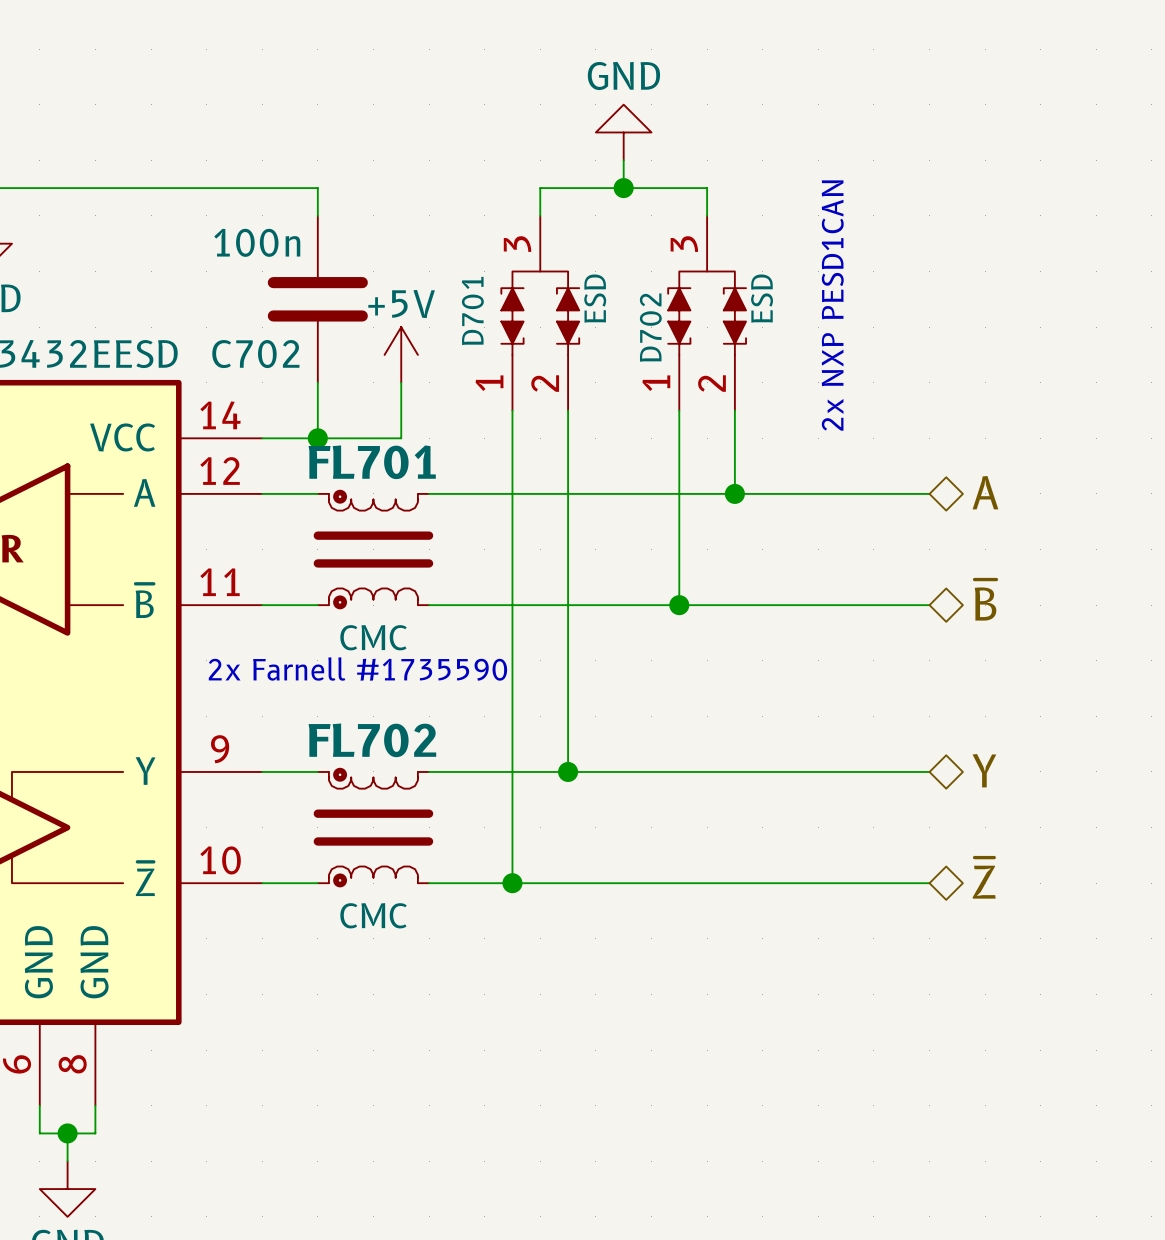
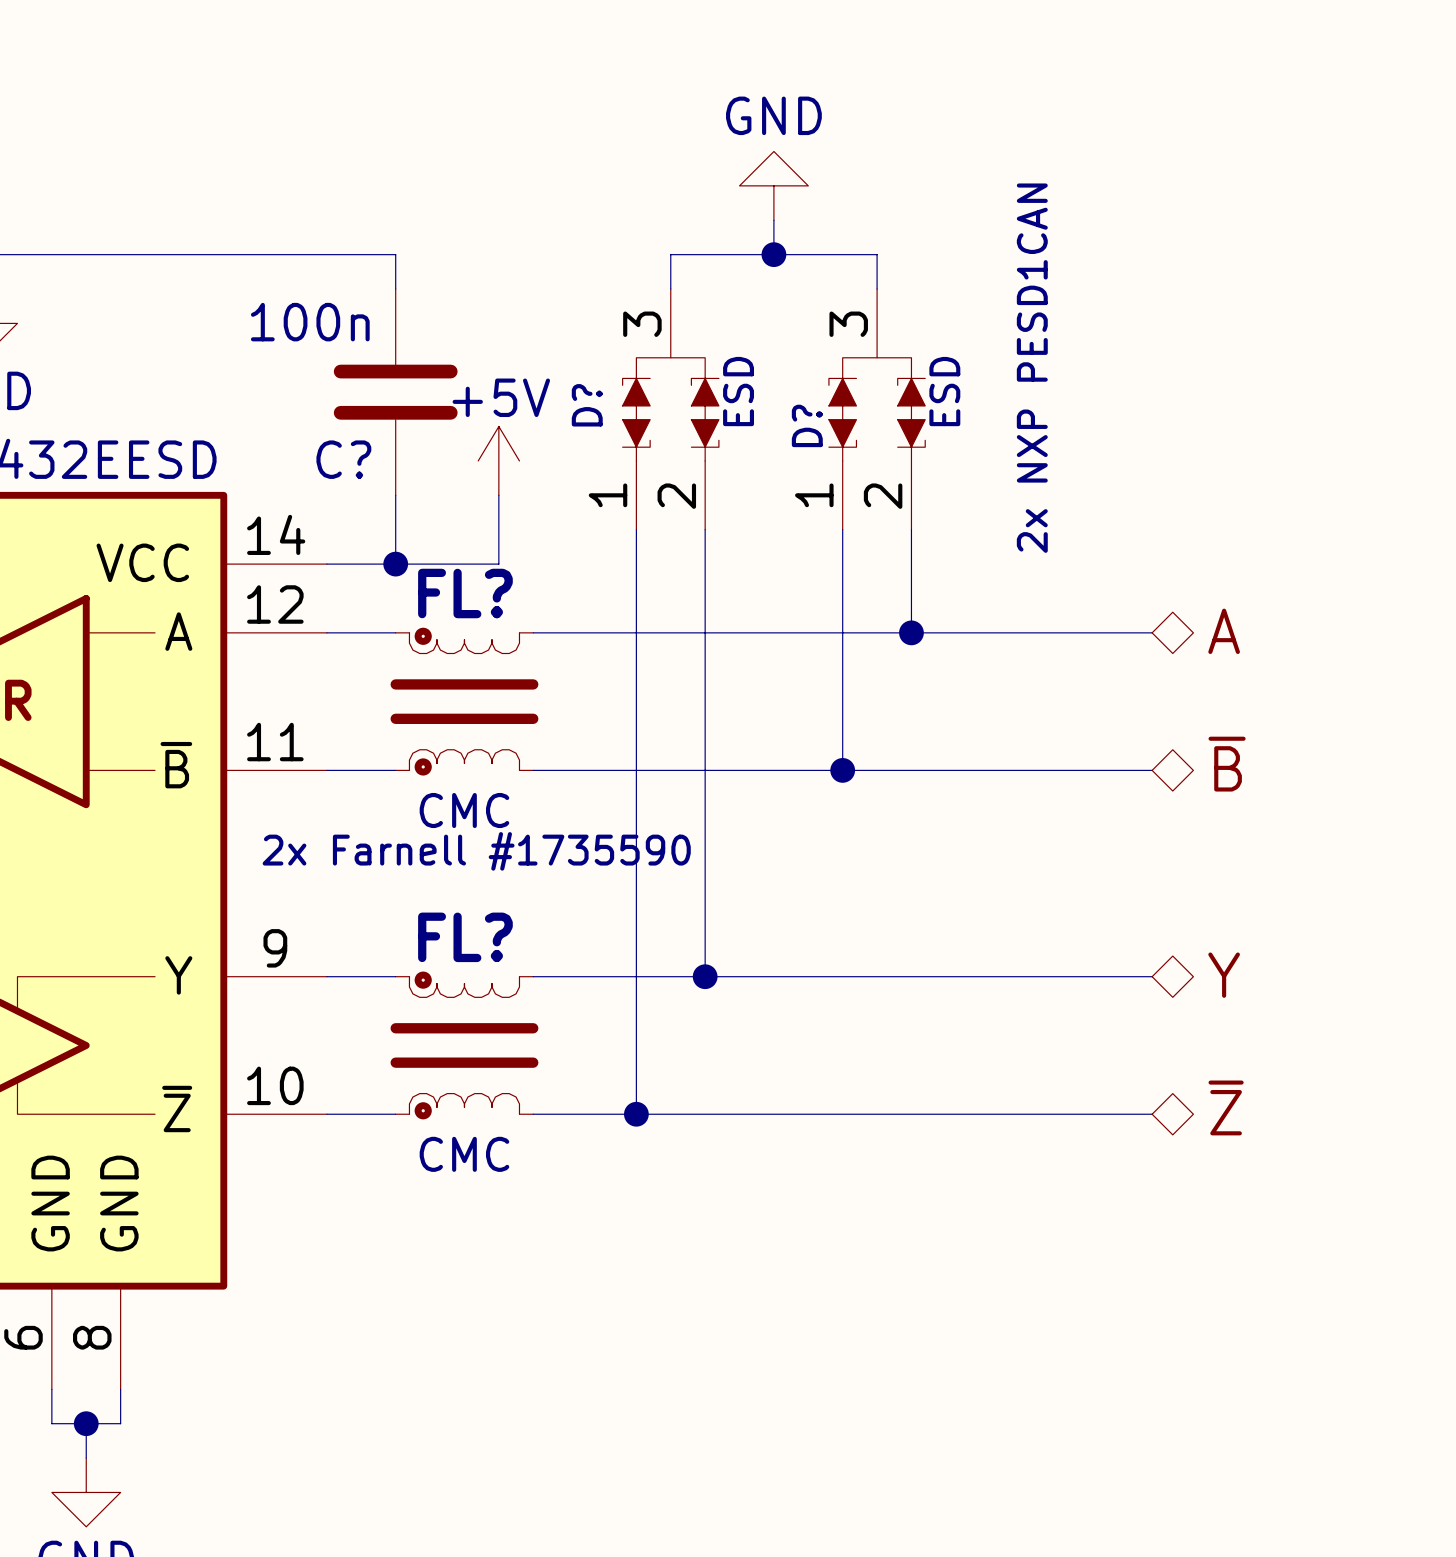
D701 name: D701 (472, 310) -> D? (587, 405)
D702 name: D702 (650, 327) -> D? (807, 425)
C702 name: C702 (255, 354) -> C? (343, 459)
FL701 name: FL701 (372, 462) -> FL? (465, 593)
FL702 name: FL702 (372, 740) -> FL? (465, 937)

